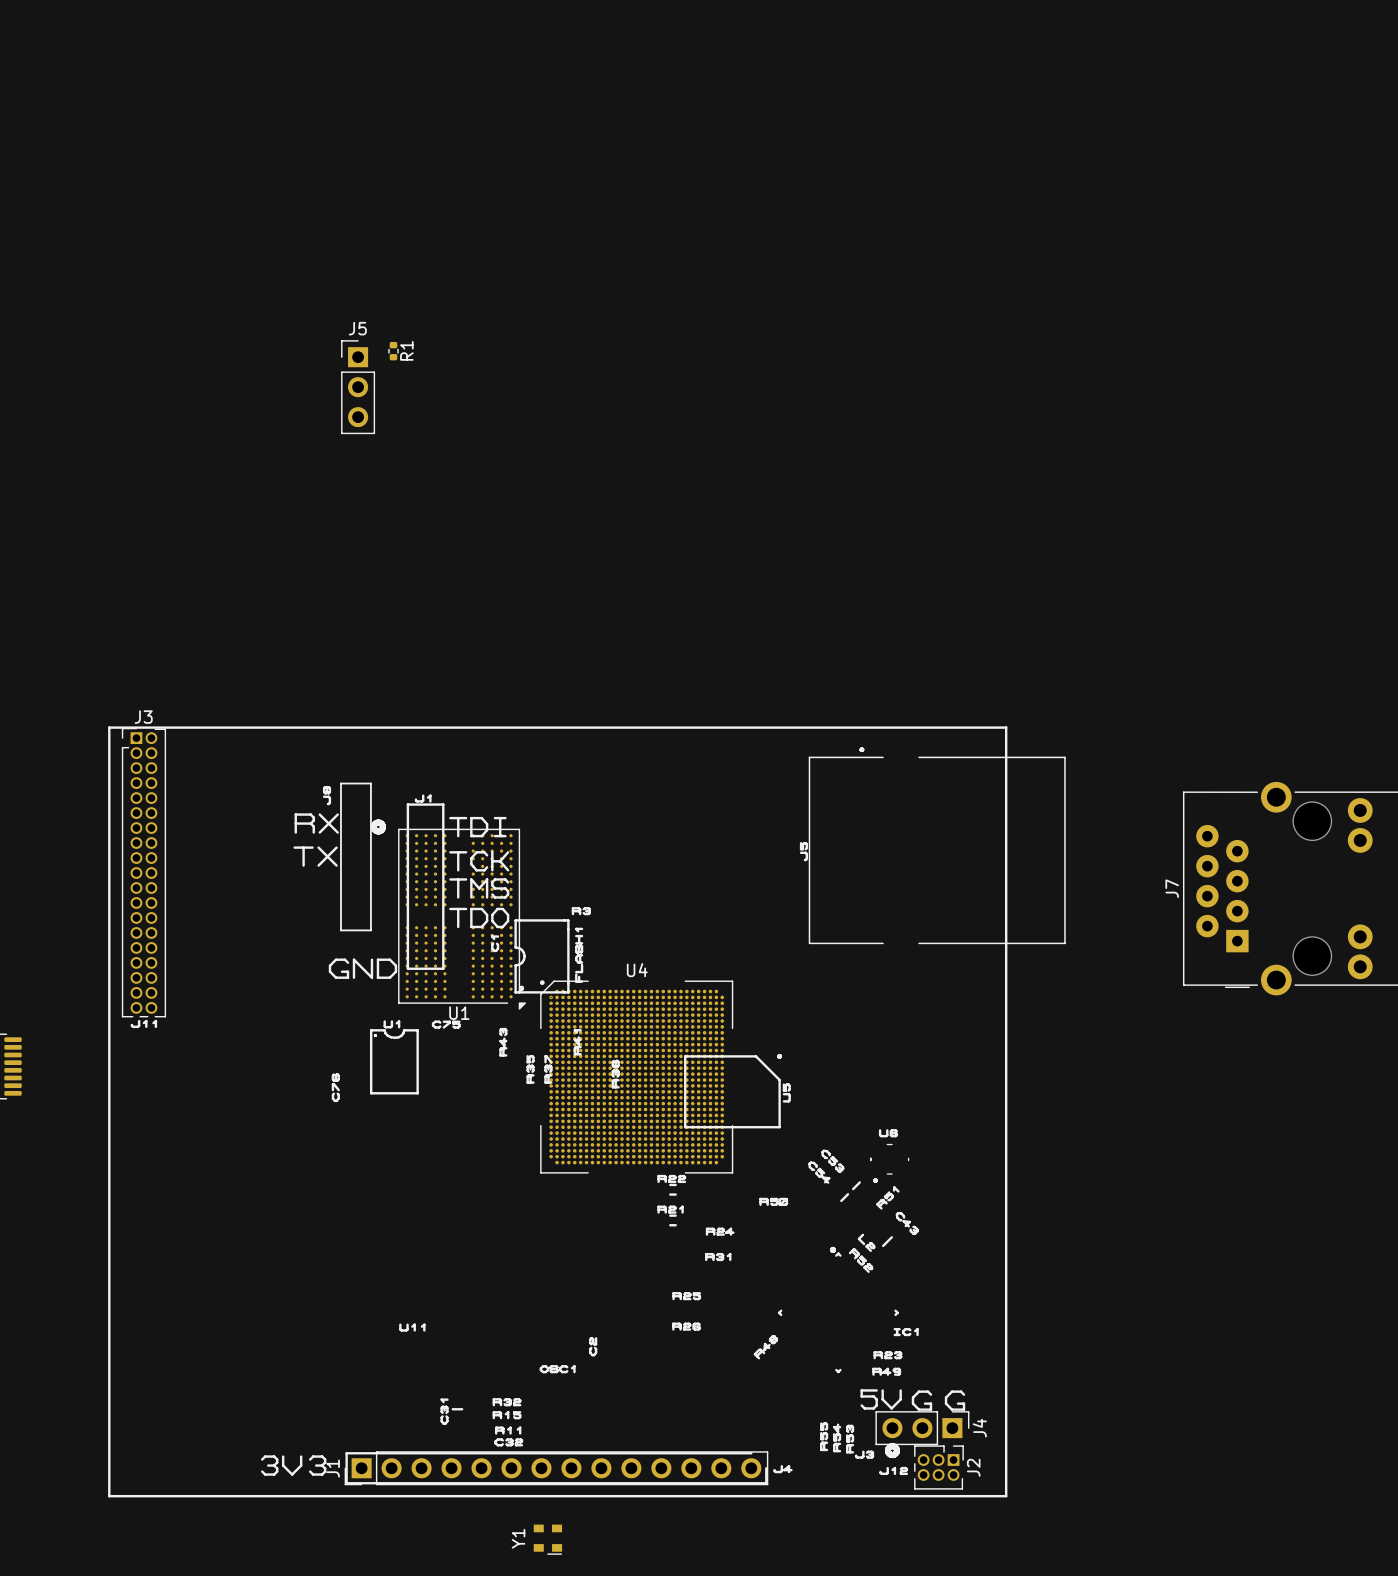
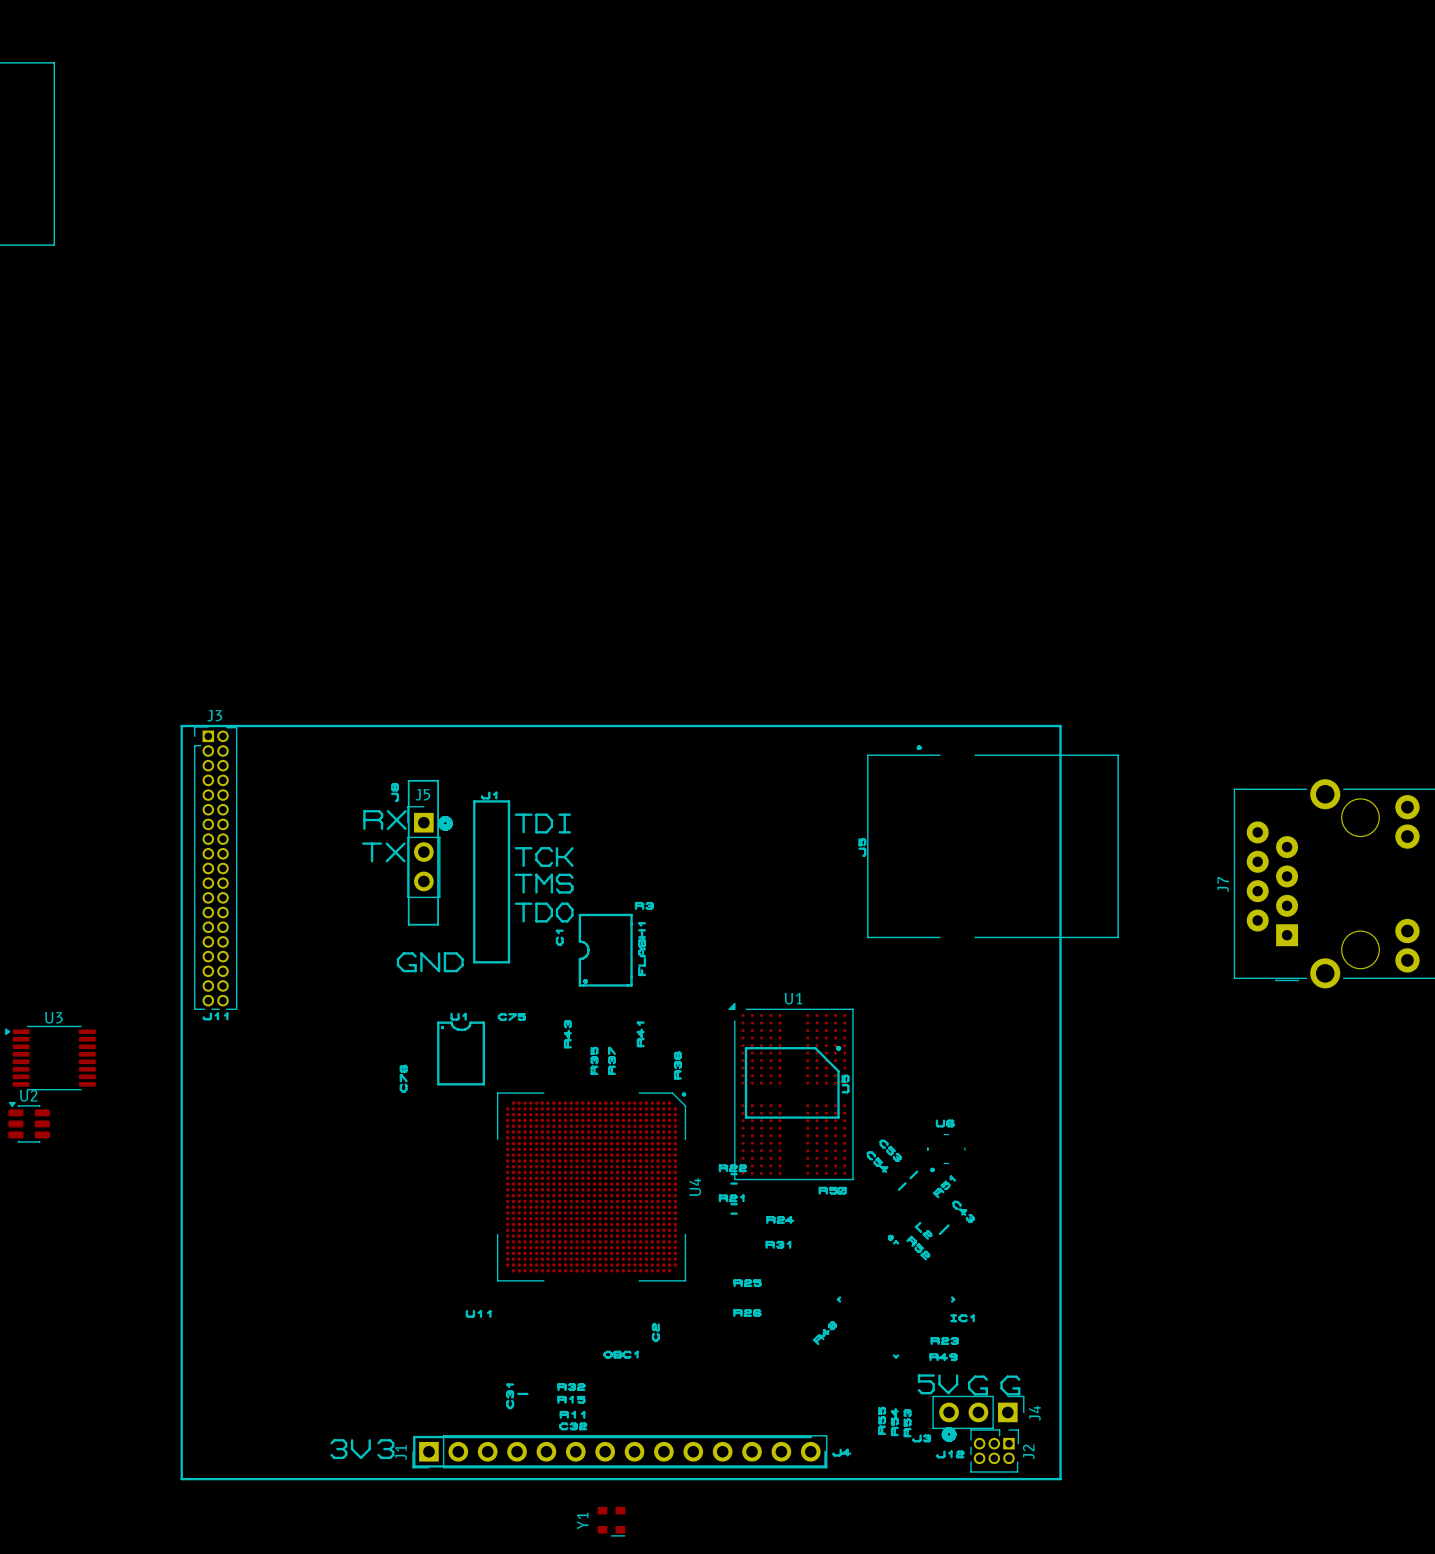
R1: (393, 351) -> none
J5 position: (358, 387) -> (423, 852)
U1 rotation: 0° (462, 919) -> 180° (791, 1091)
U1 position: (462, 919) -> (791, 1091)
U4 name position: U4 (637, 970) -> U4 (695, 1187)
U4 footprint: [539, 980, 734, 1174] -> [496, 1092, 687, 1282]

